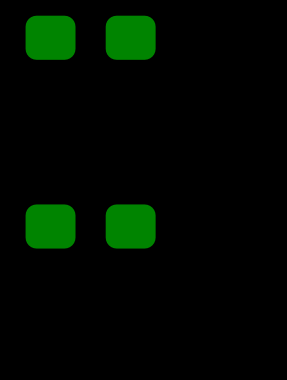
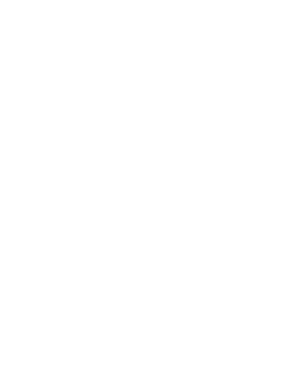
part: (90, 37) -> none
part: (90, 226) -> none

